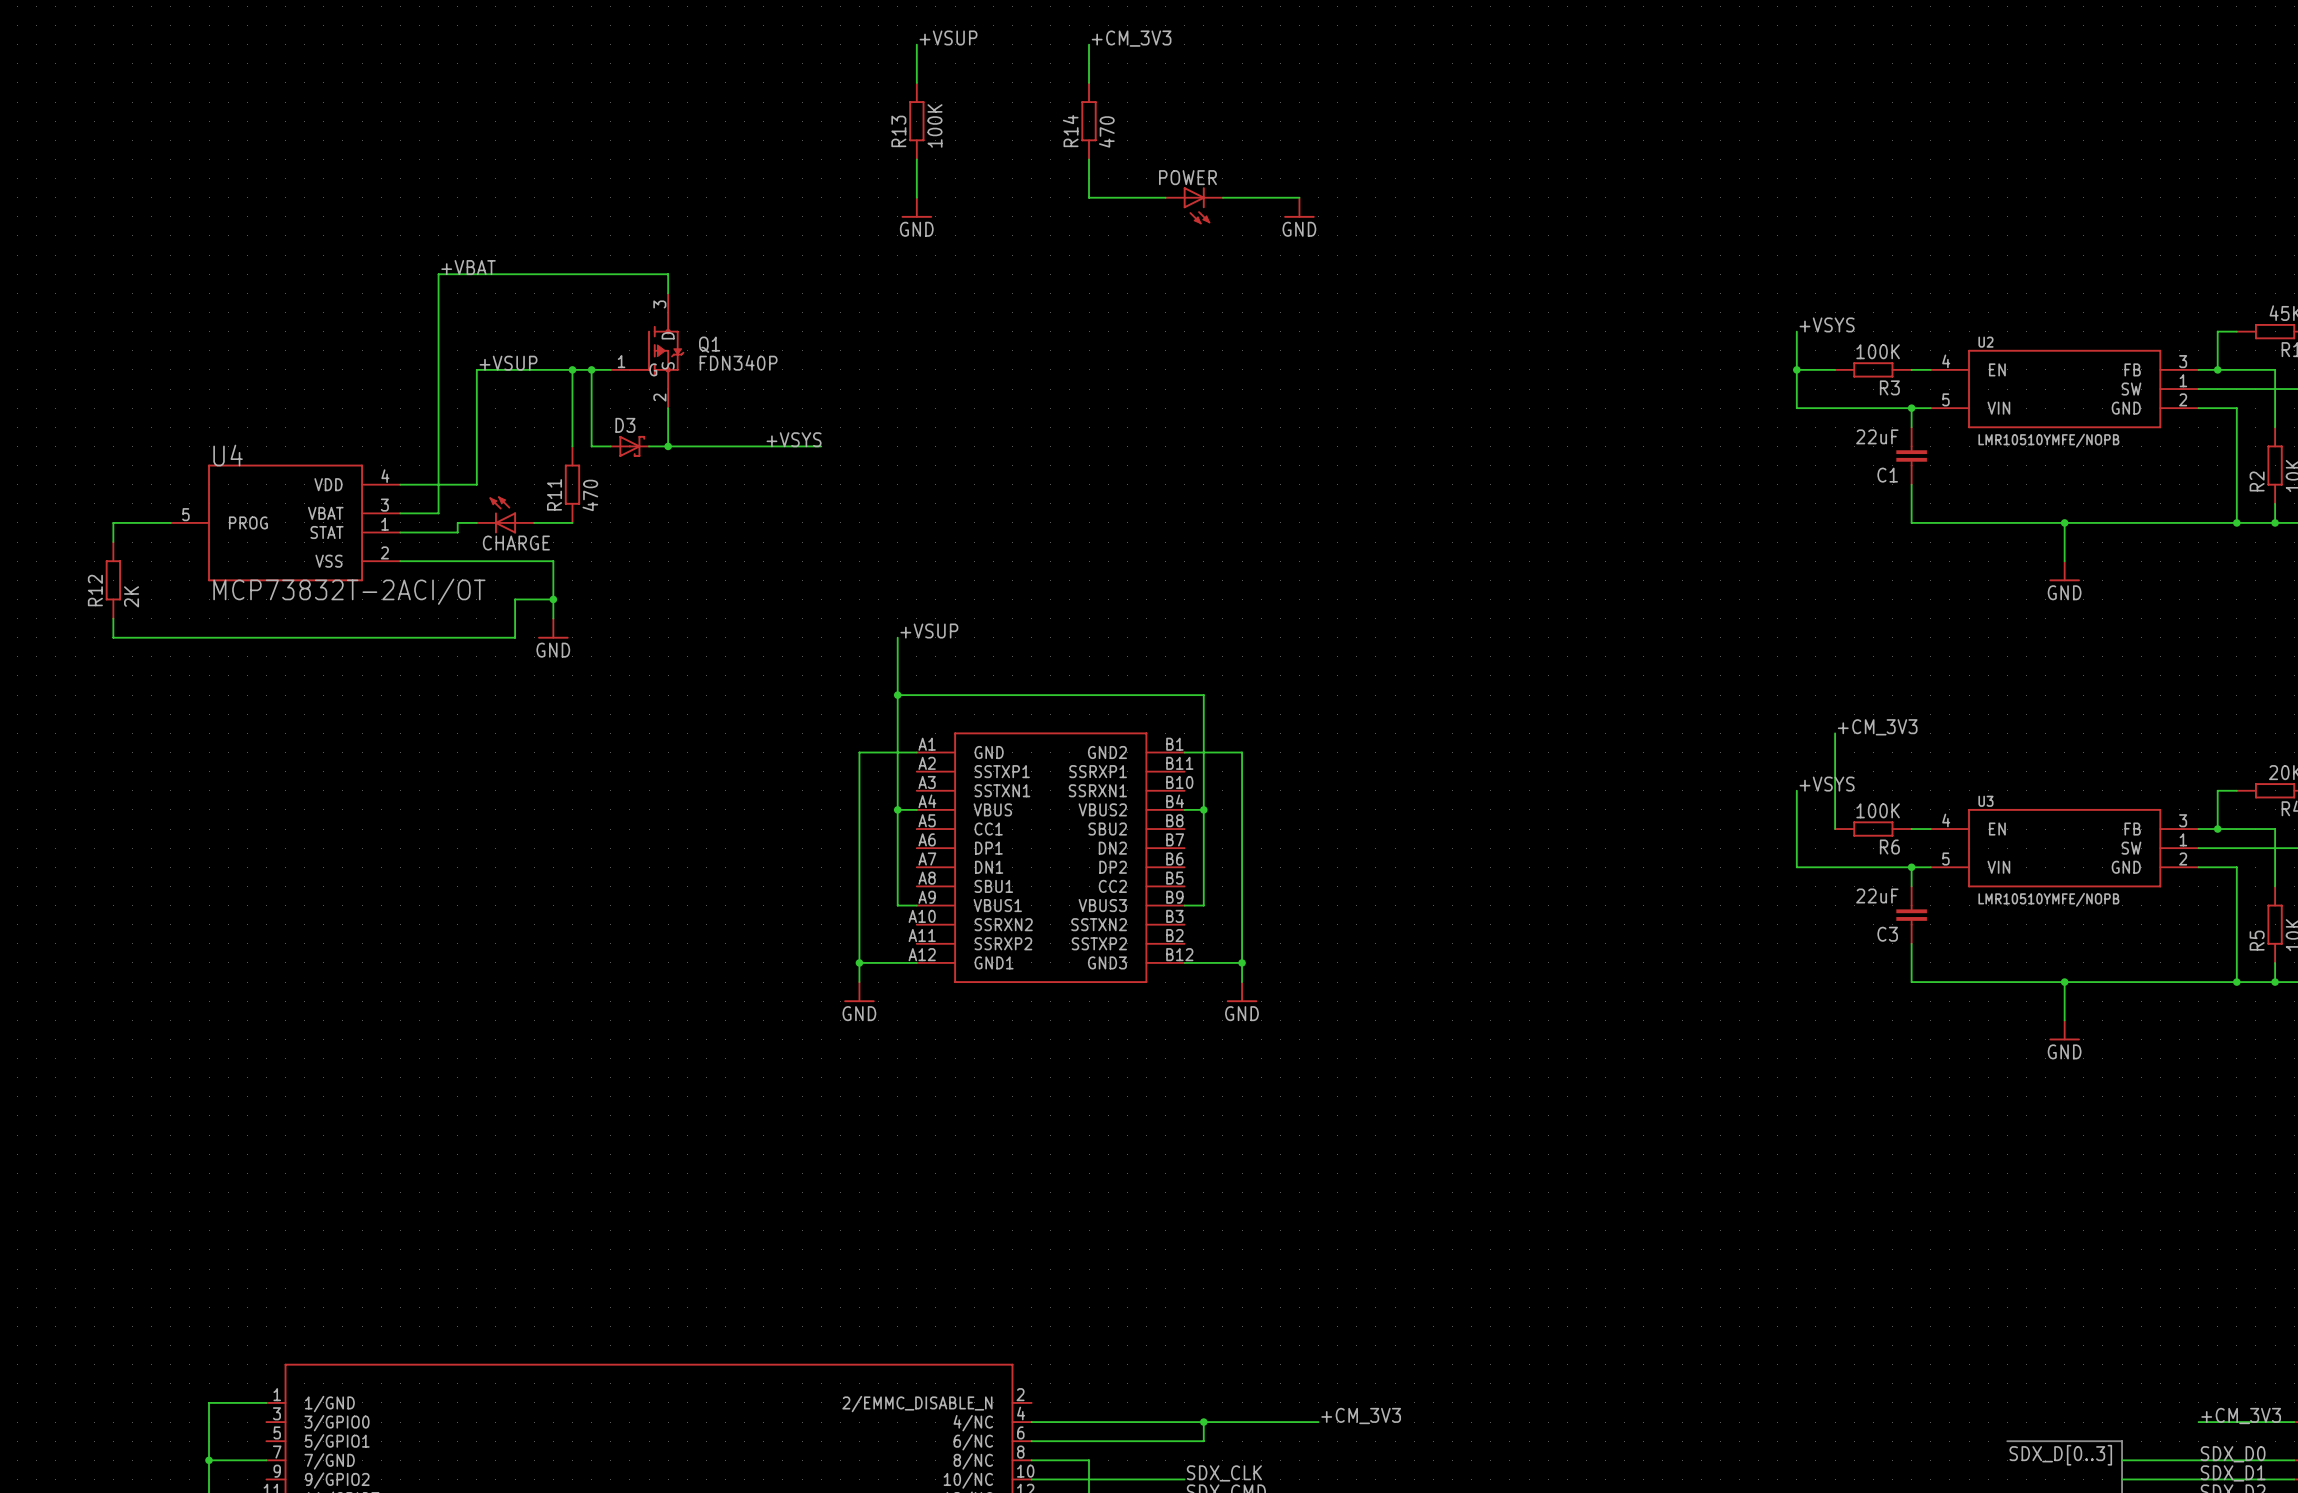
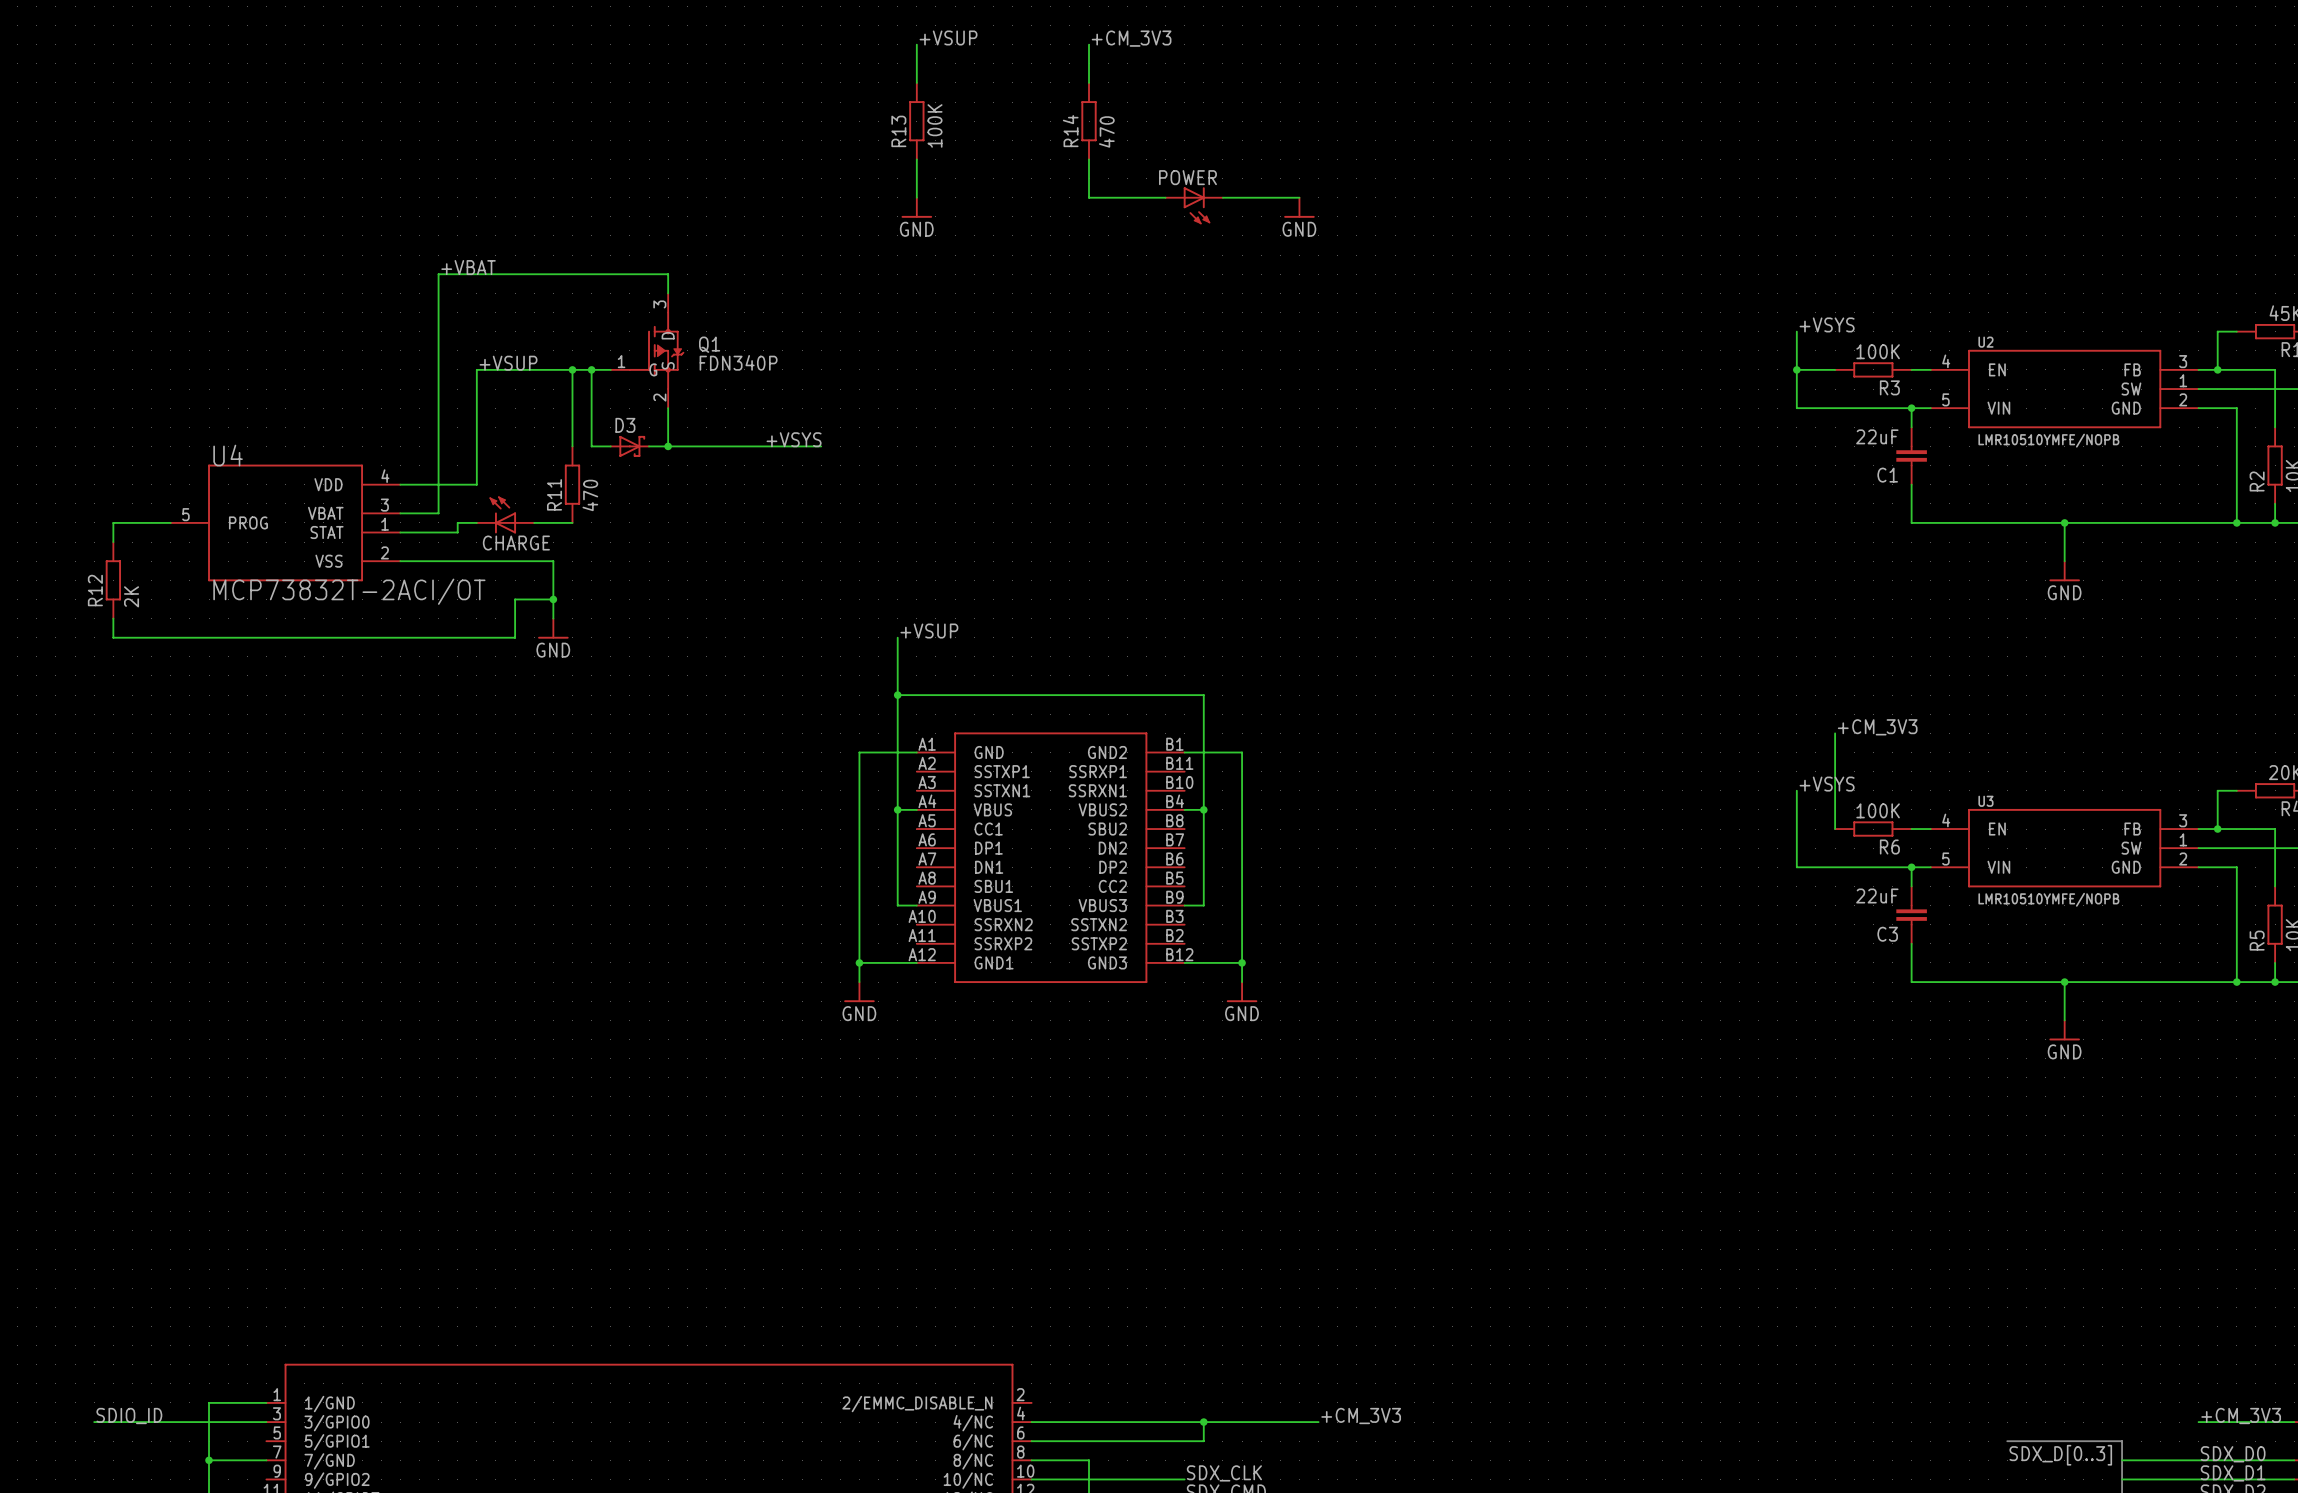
label: none -> SDIO_ID (129, 1416)
wire: none -> (94, 1422) (266, 1422)

